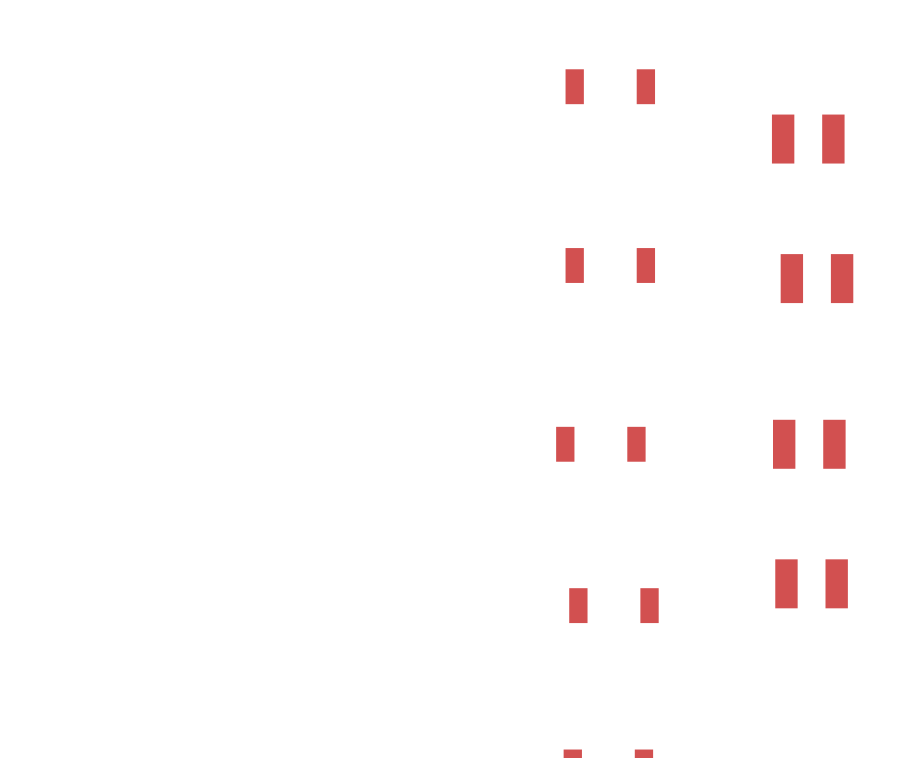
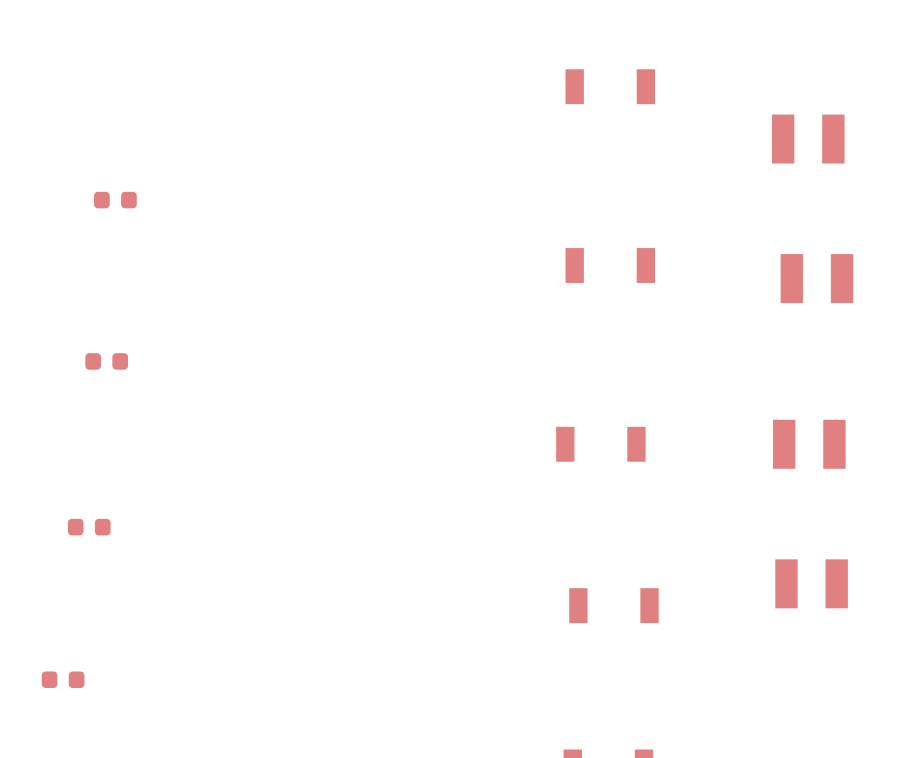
part: none -> (115, 200)
part: none -> (106, 361)
part: none -> (89, 527)
part: none -> (63, 679)

